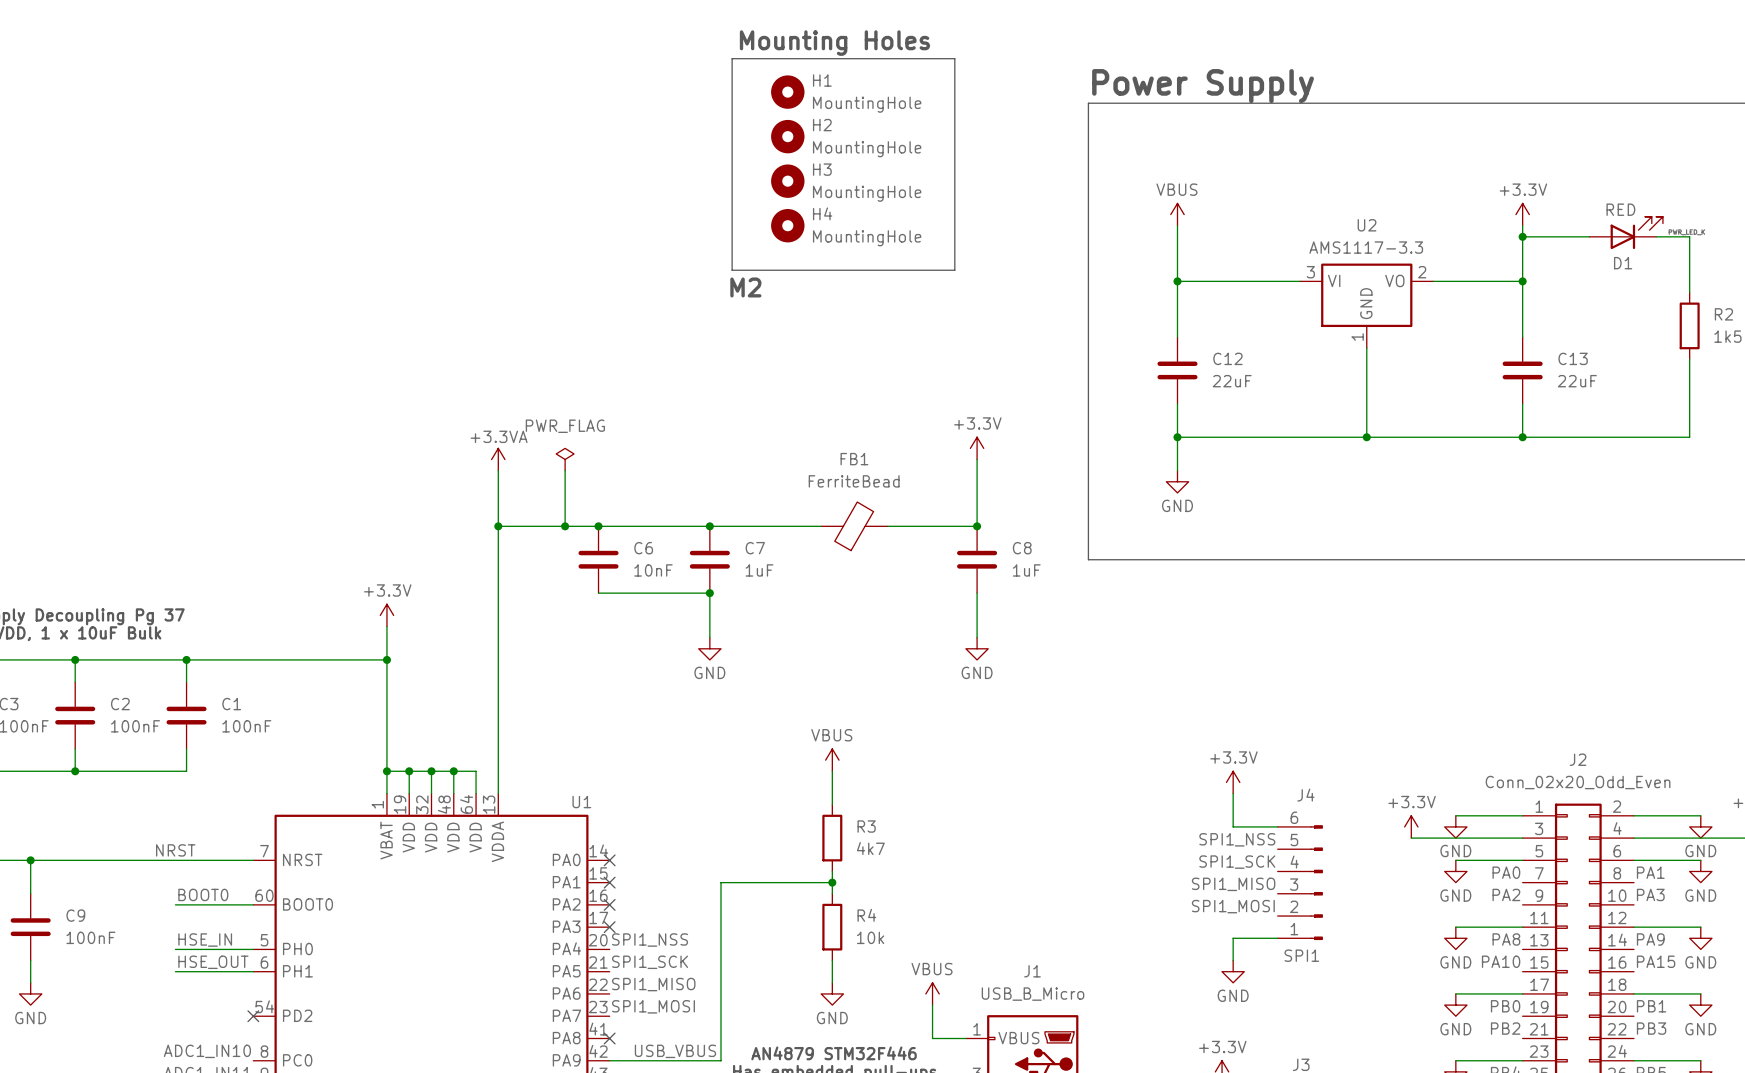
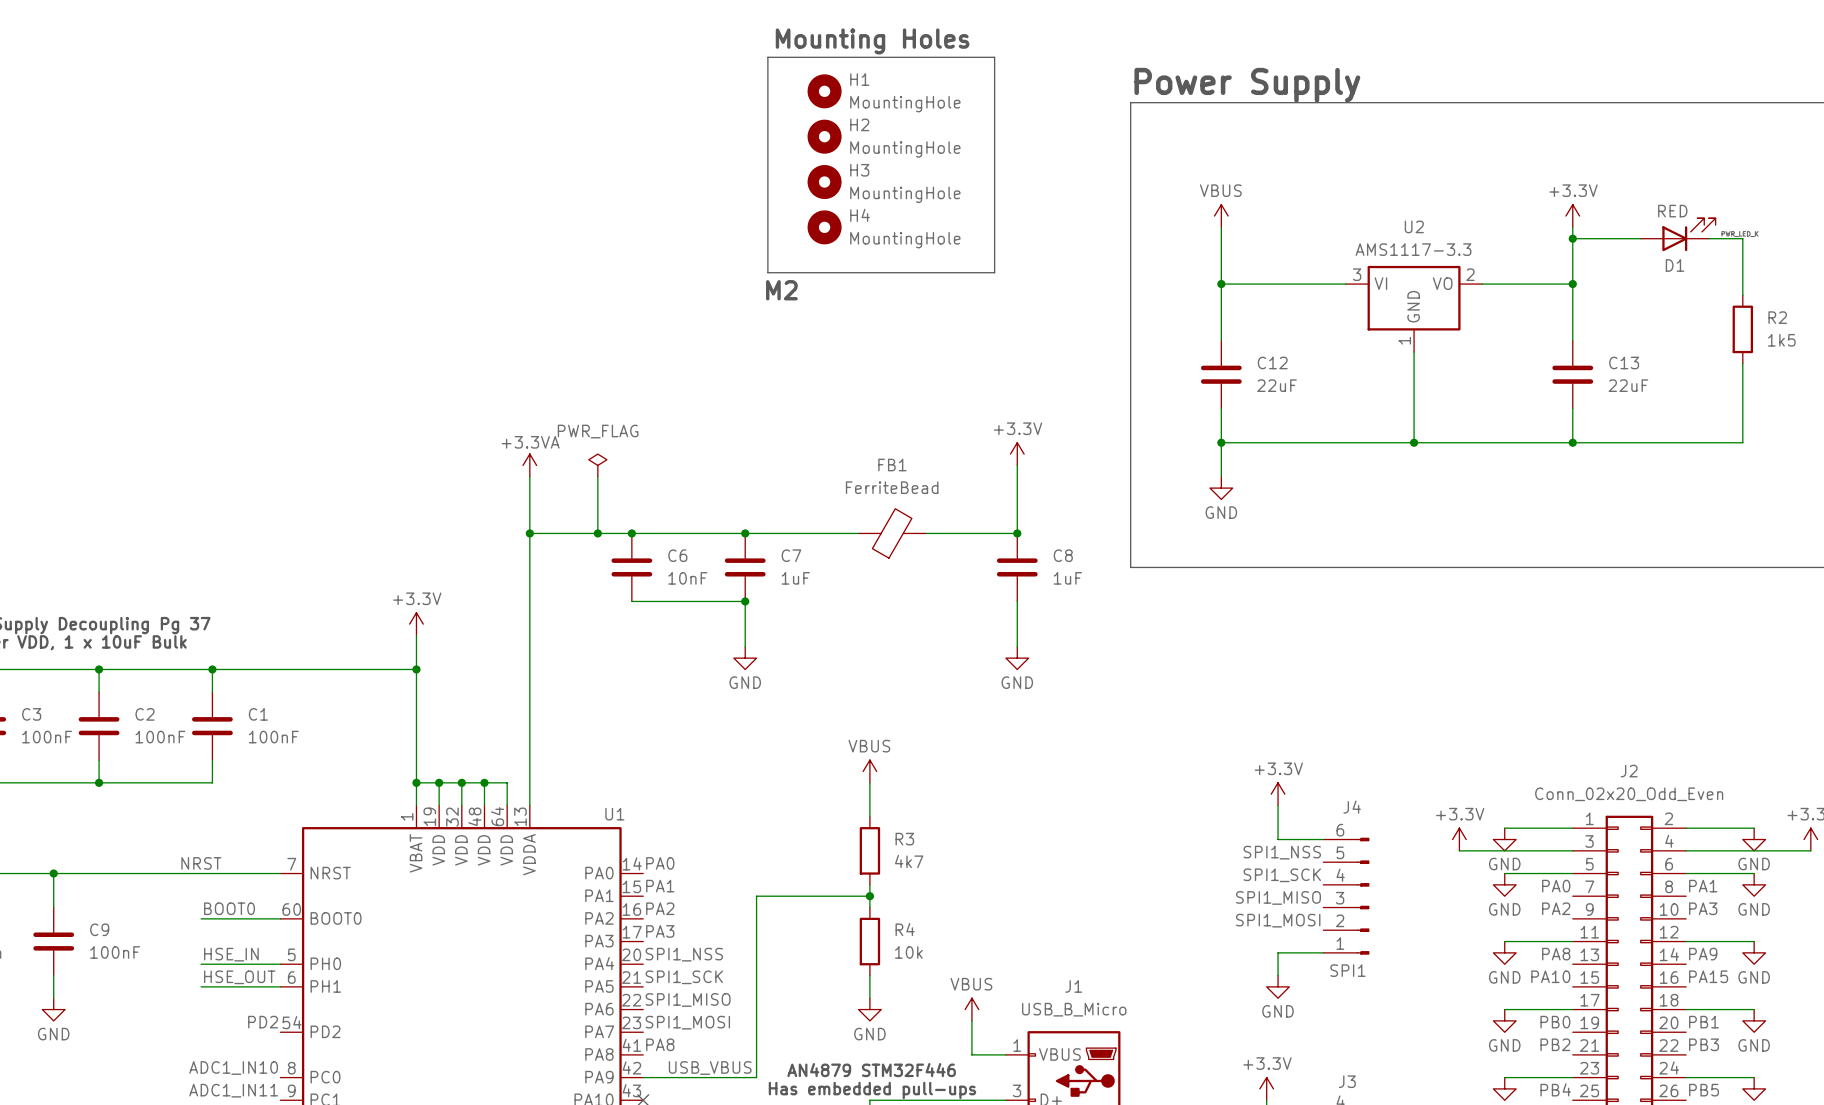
label: none -> PA0 (660, 863)
no-connect mark: (609, 860) -> none
label: none -> PA1 (660, 886)
no-connect mark: (609, 882) -> none
label: none -> PA2 (660, 908)
no-connect mark: (609, 904) -> none
label: none -> PA3 (660, 931)
no-connect mark: (609, 927) -> none
label: none -> PD2 (263, 1022)
no-connect mark: (253, 1016) -> none
label: none -> PA8 (660, 1044)
no-connect mark: (609, 1038) -> none

